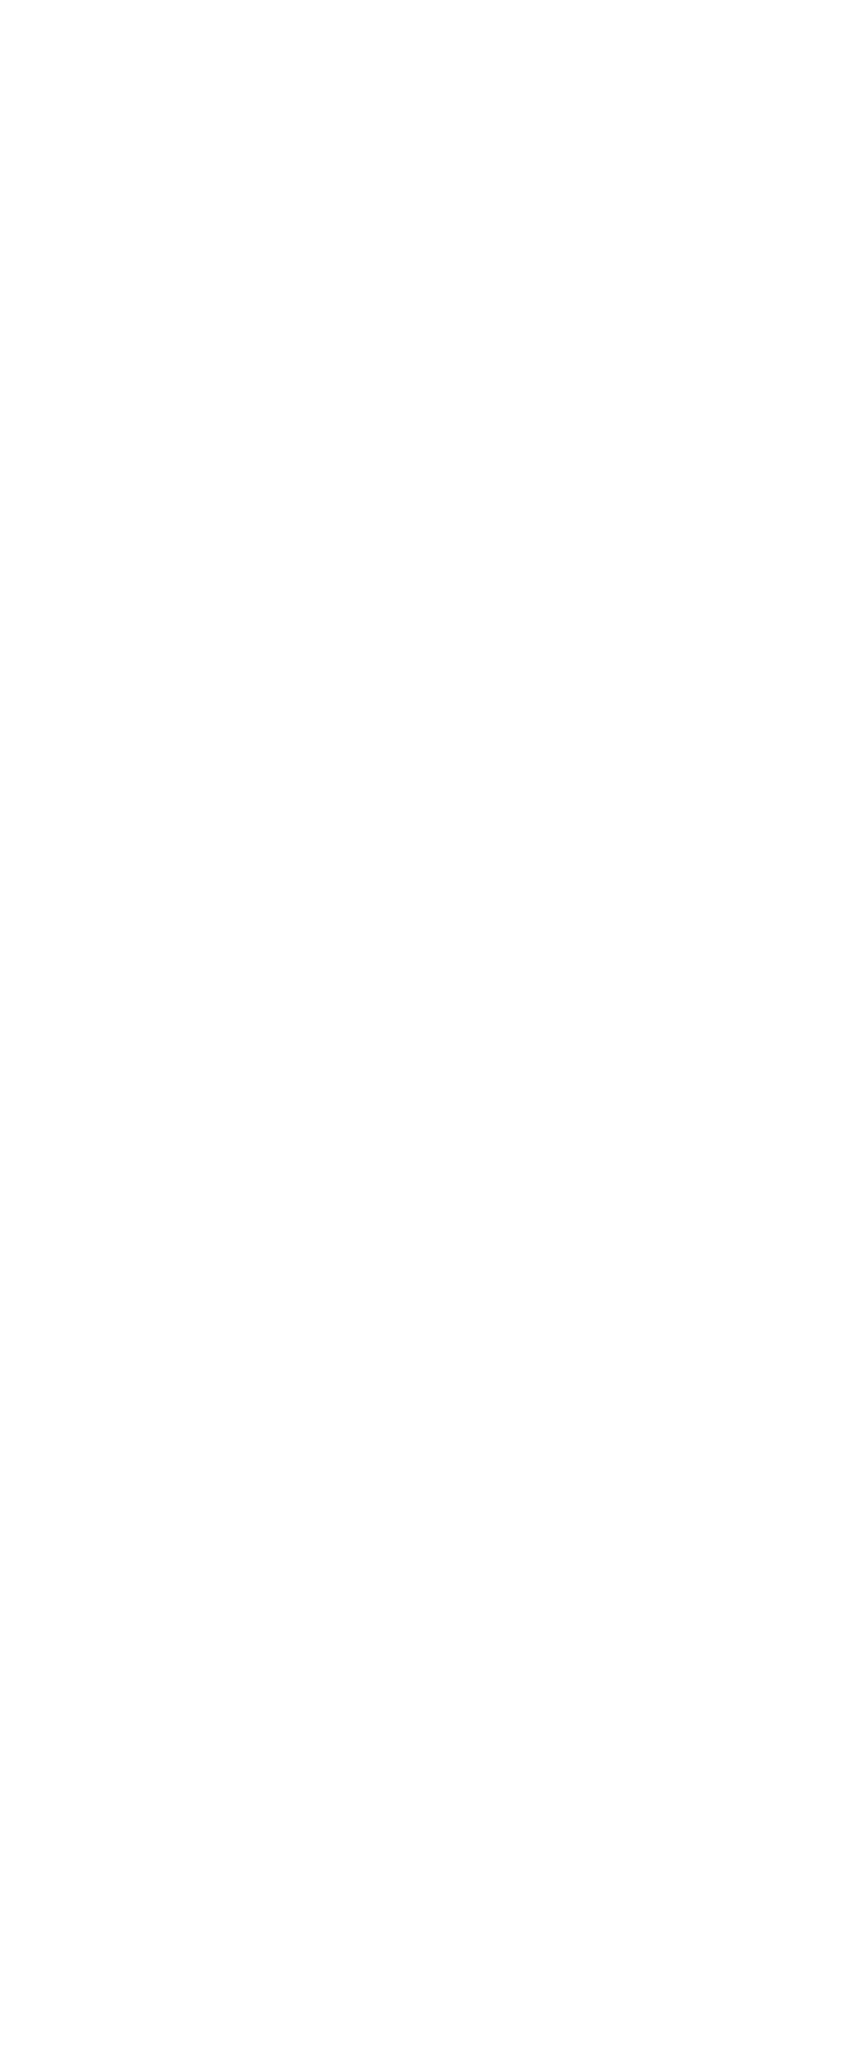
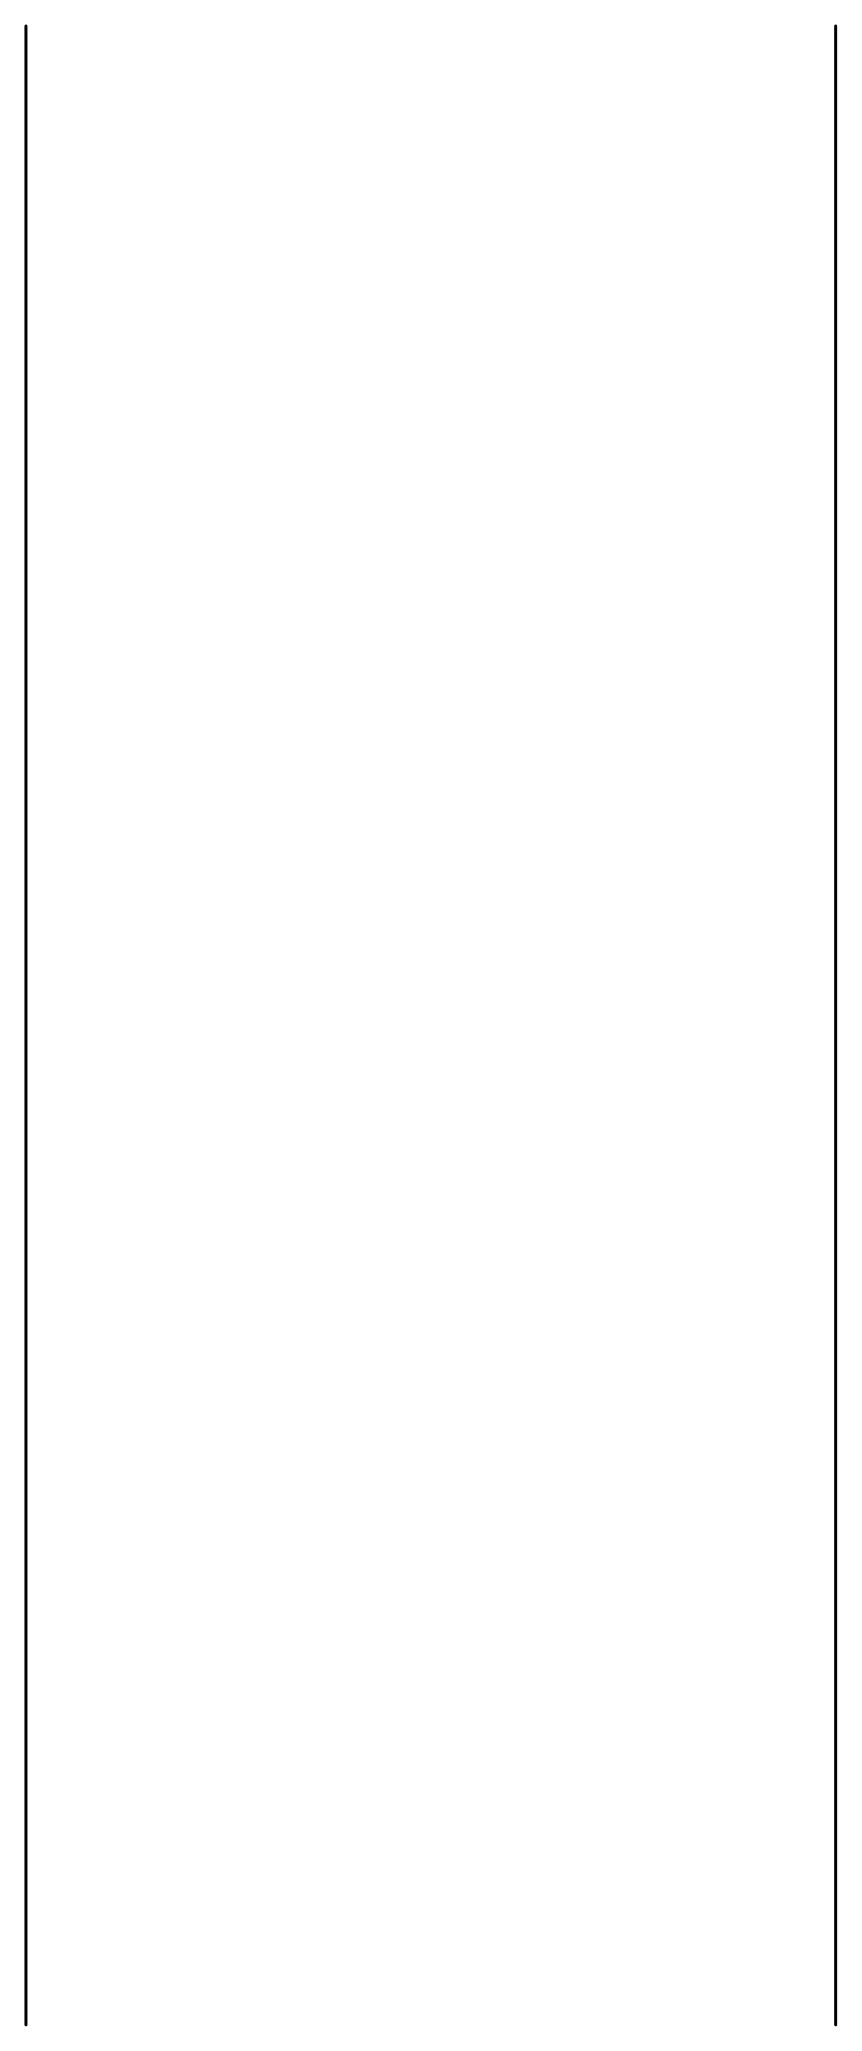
line: none -> (25, 25) (25, 2024)
line: none -> (835, 25) (835, 2024)

